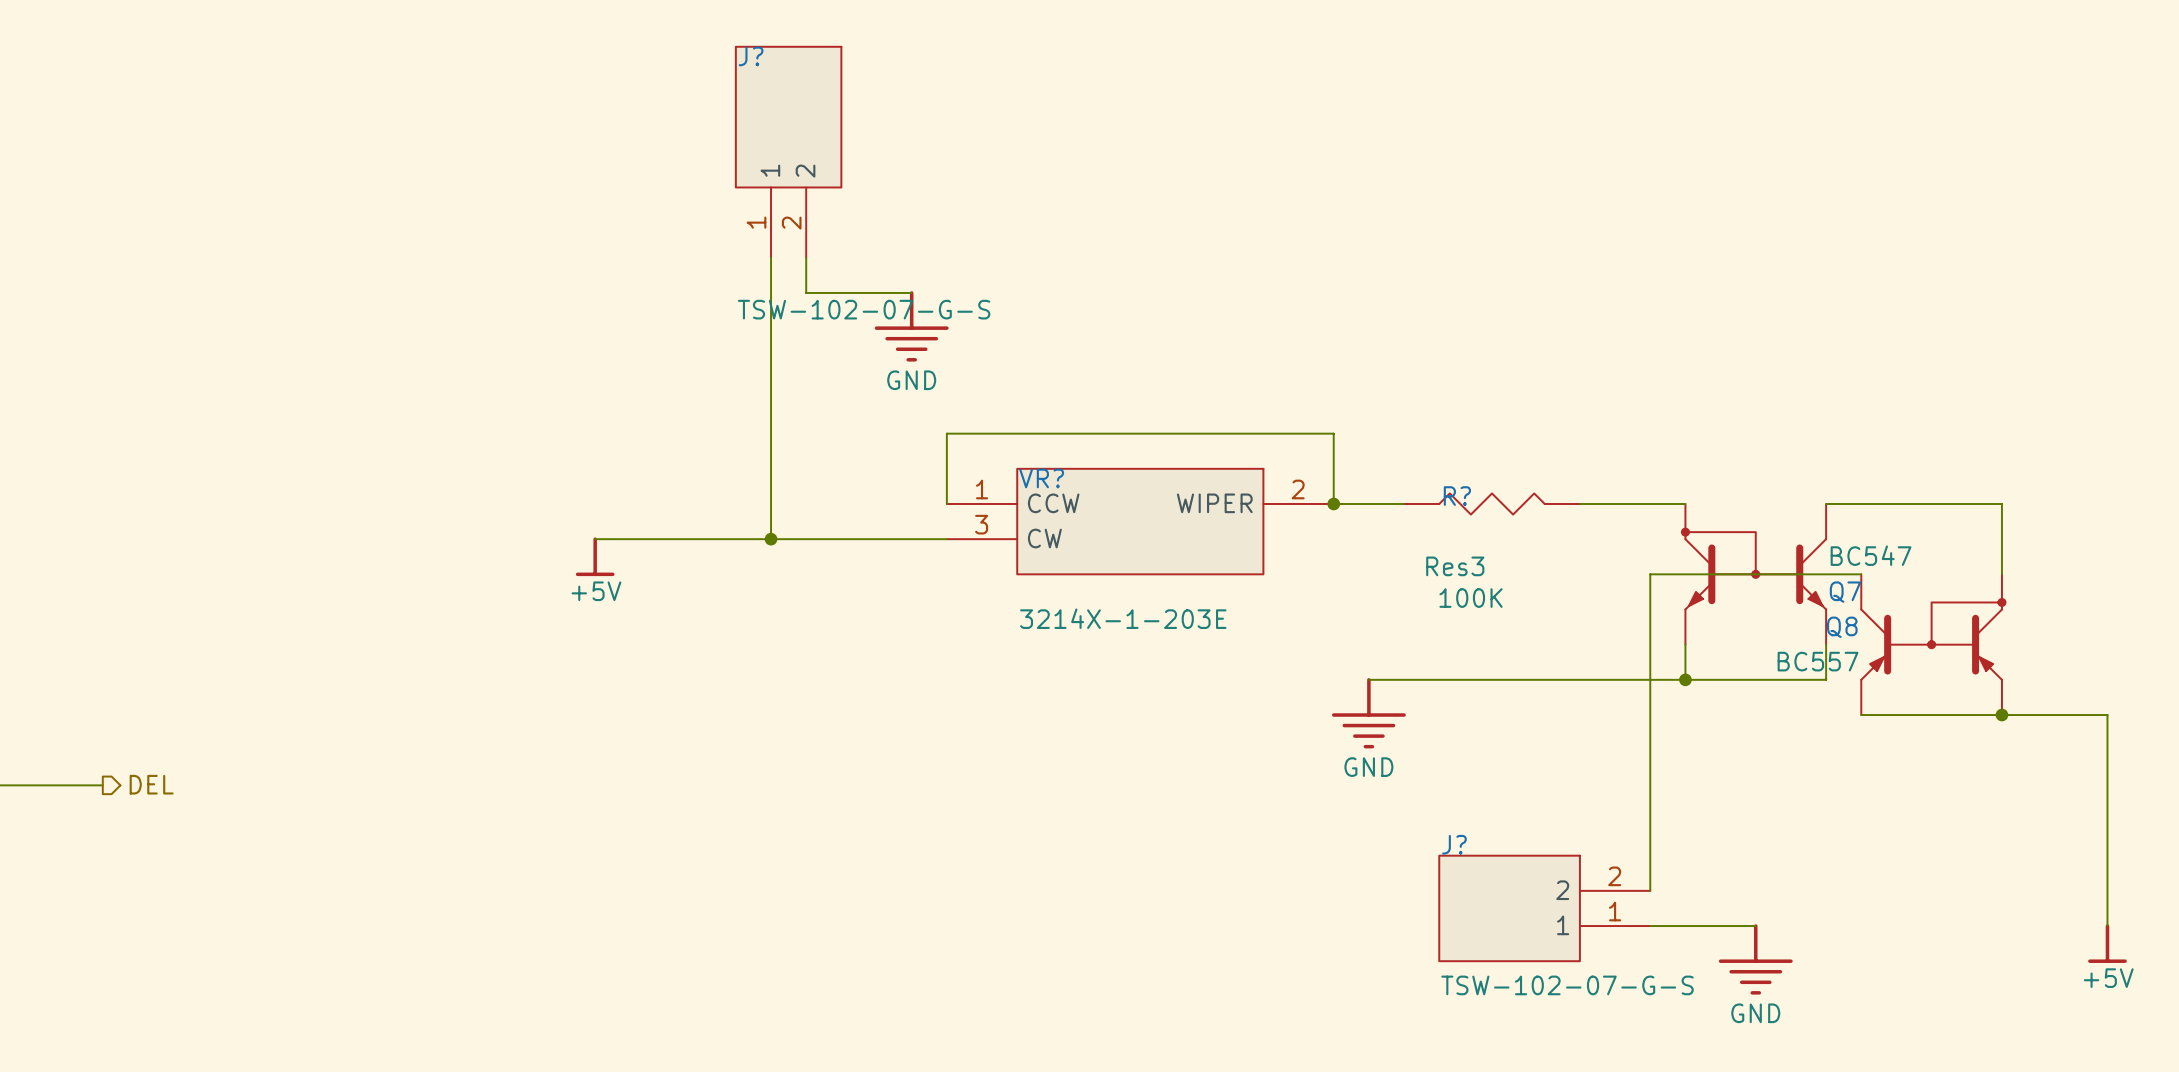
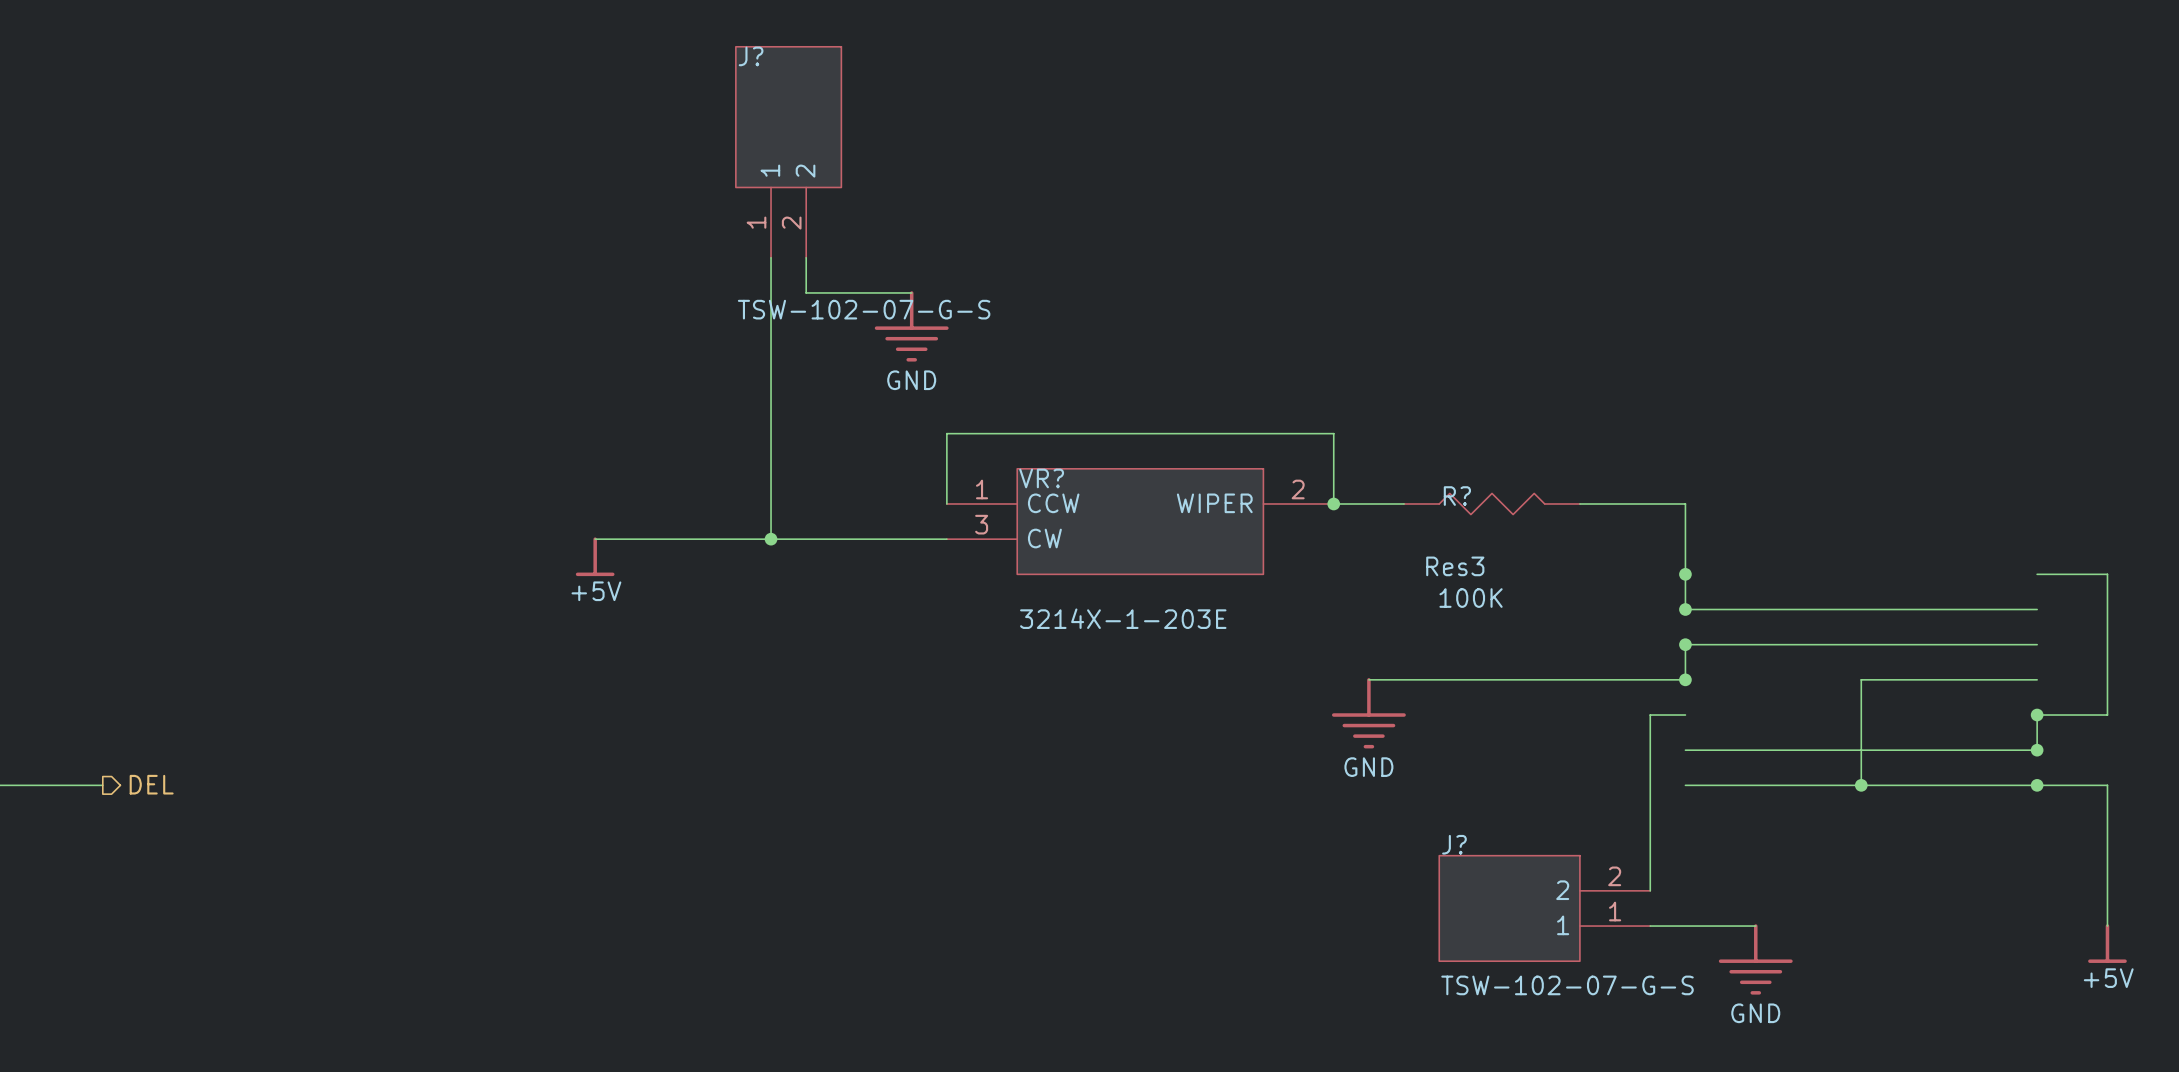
wire: none -> (1685, 503) (1685, 609) (2037, 609)
wire: (1826, 503) (2001, 503) (2001, 574) -> none
junction: none -> (1685, 574)
Q7: BC547 (1754, 574) -> none
wire: (1861, 574) (1650, 574) (1650, 715) -> (1685, 715) (1650, 715)
junction: none -> (1685, 609)
wire: none -> (1685, 644) (2037, 644)
junction: none -> (1685, 644)
wire: (1826, 644) (1826, 679) (1685, 679) -> none
Q8: BC557 (1933, 644) -> none
wire: none -> (2037, 679) (1861, 679) (1861, 785)
wire: (1861, 715) (2037, 715) -> (1685, 750) (2037, 750) (2037, 715)
junction: (2001, 715) -> none
junction: none -> (2037, 715)
wire: (2107, 715) (2107, 785) -> (2107, 715) (2107, 574) (2037, 574)
junction: none -> (2037, 750)
wire: none -> (1685, 785) (2107, 785)
junction: none -> (1861, 785)
junction: none -> (2037, 785)

